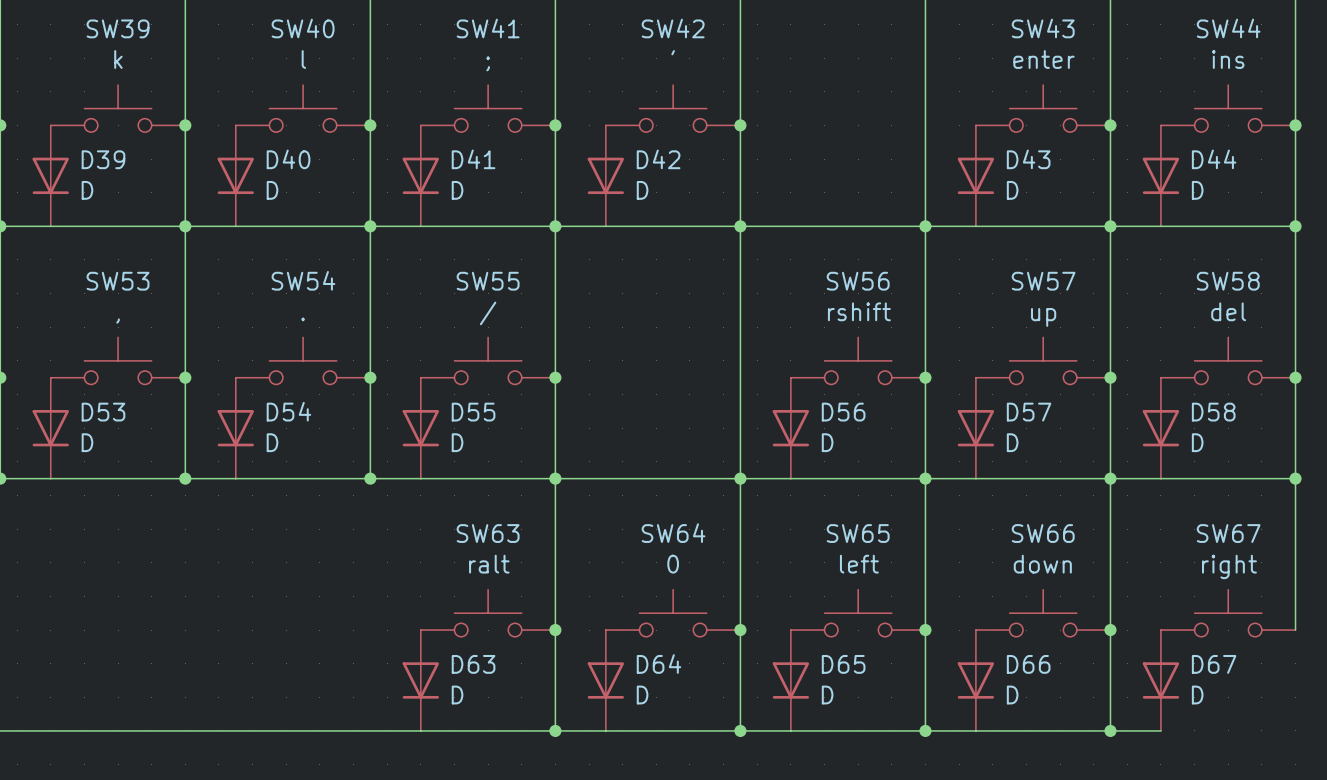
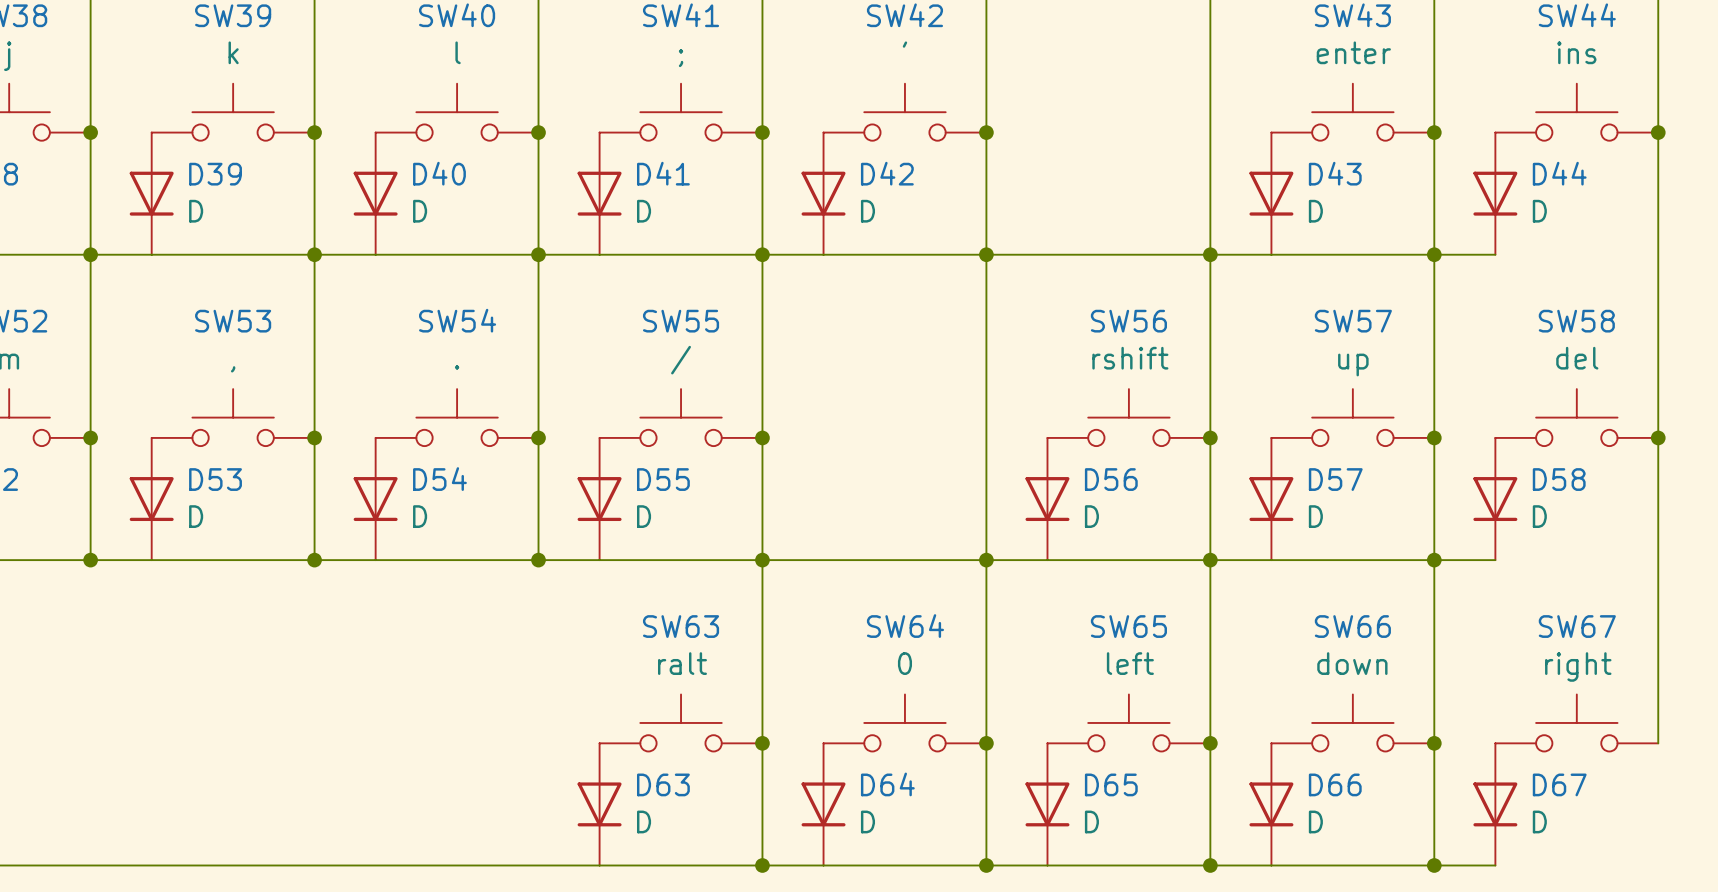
wire: (1160, 226) (1295, 226) -> none
junction: (1295, 226) -> none
wire: (1160, 478) (1295, 478) -> none
junction: (1295, 478) -> none

